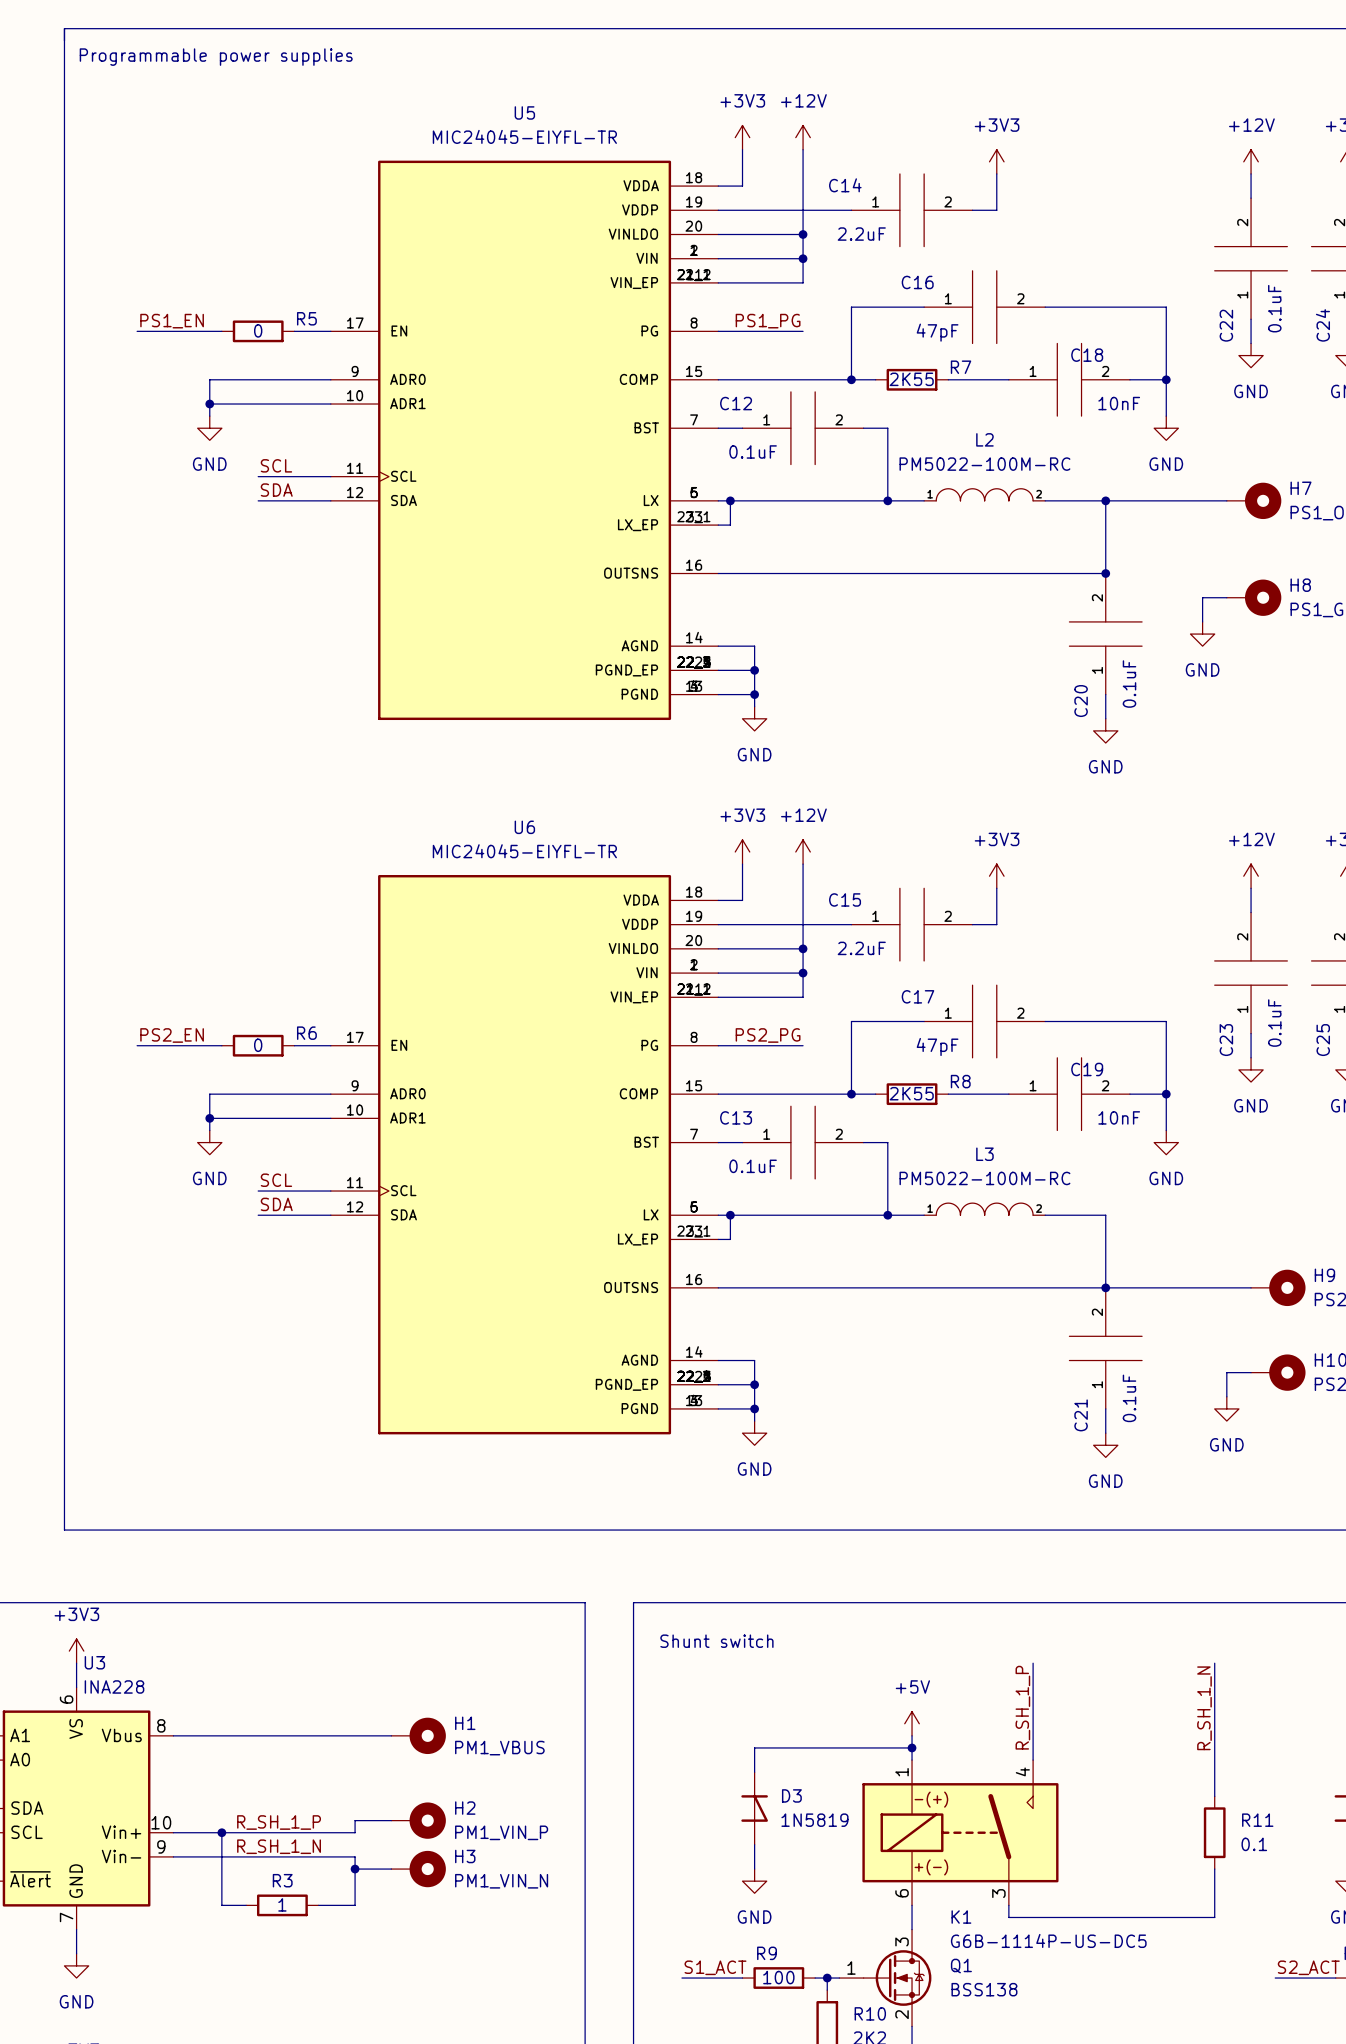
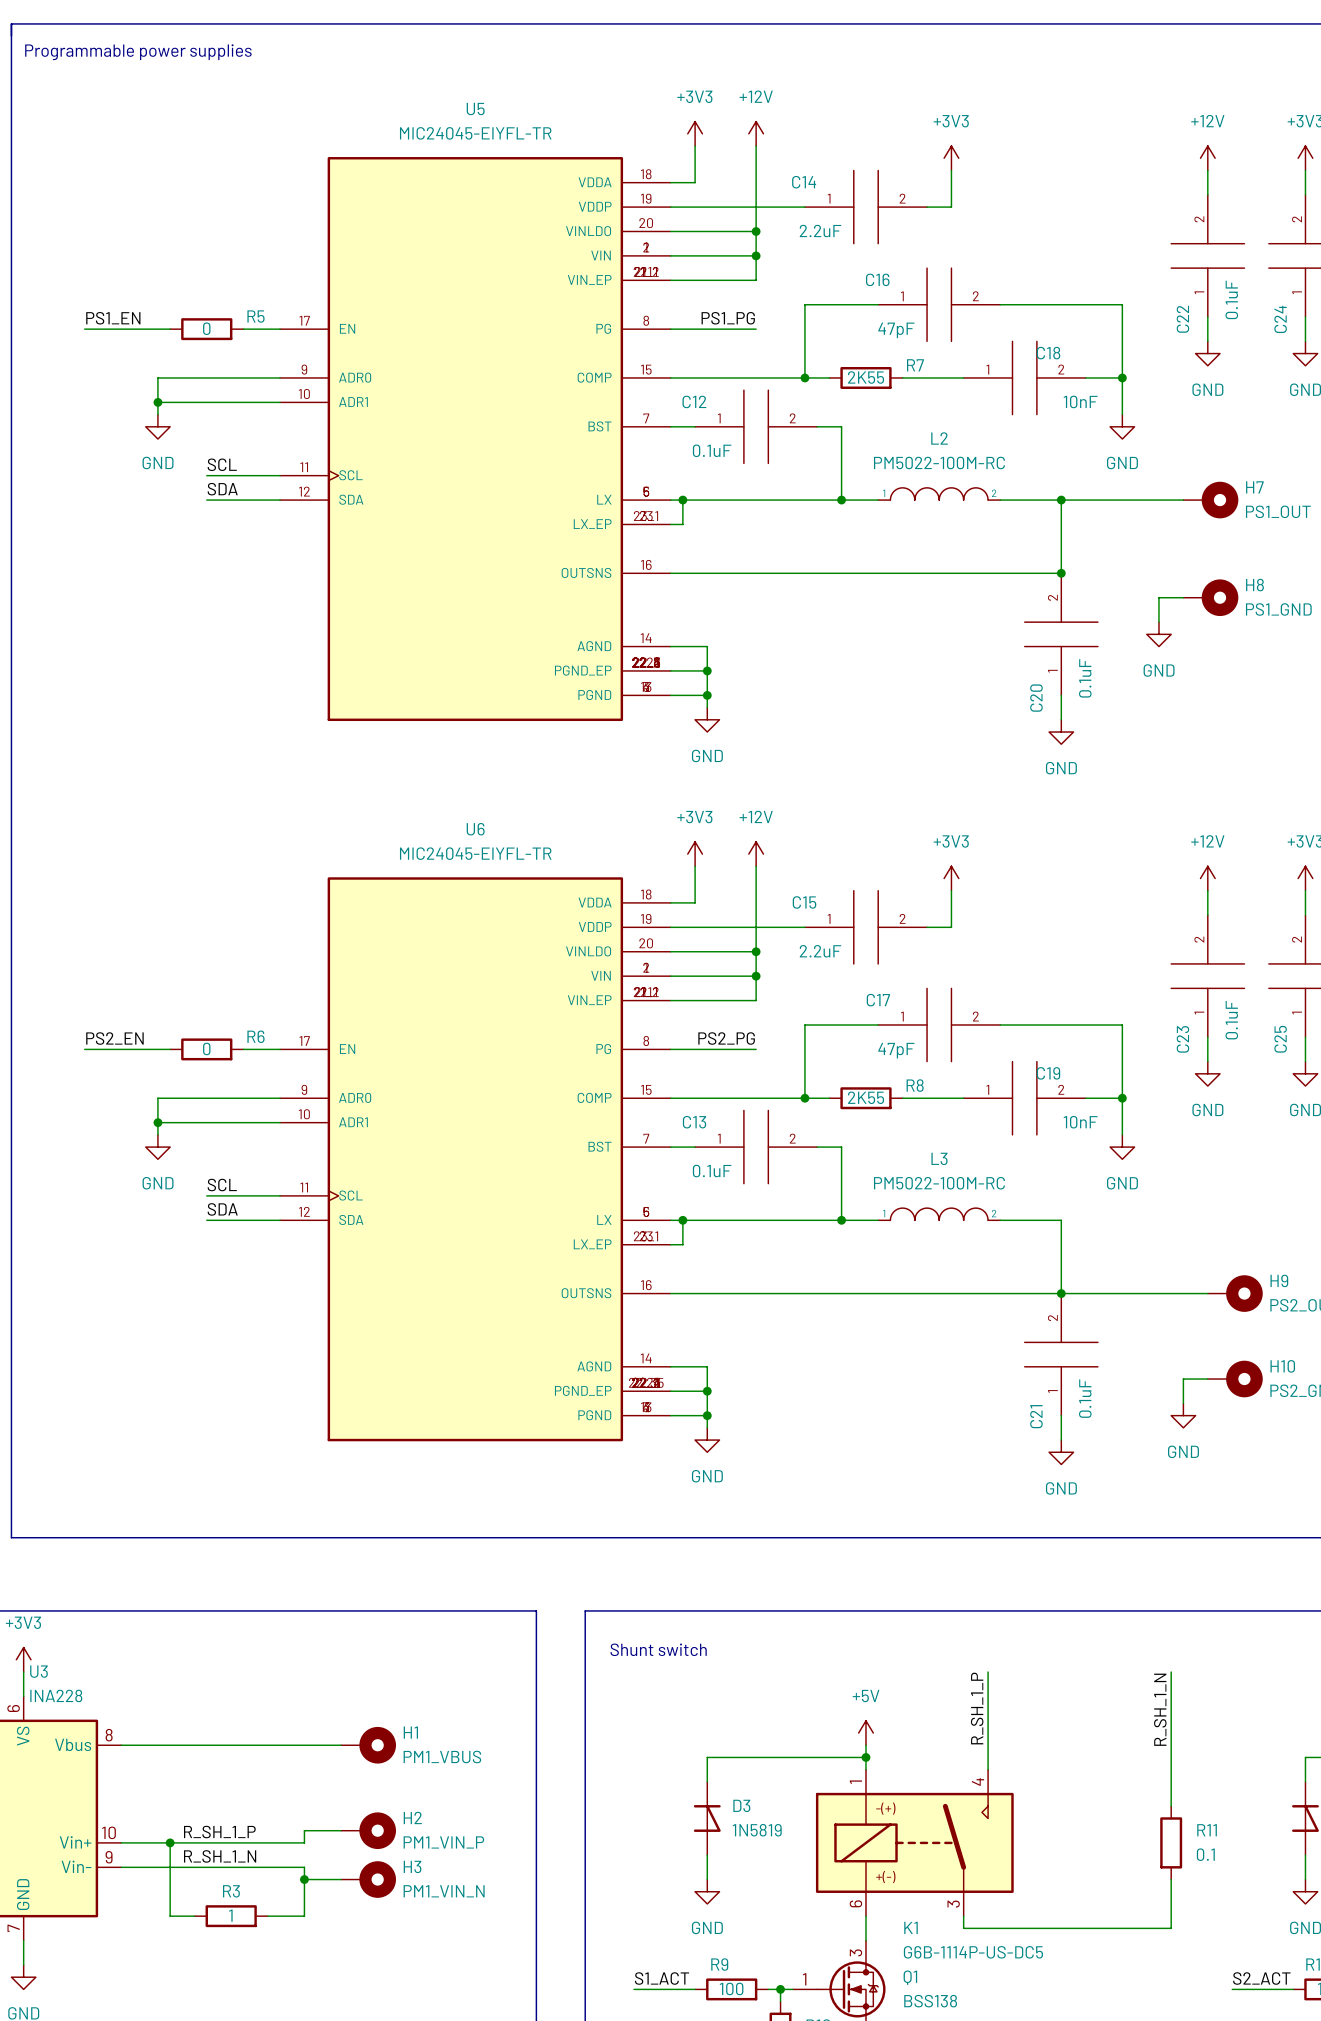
U6 symbol: [330, 875, 719, 1435] -> [280, 877, 671, 1442]

